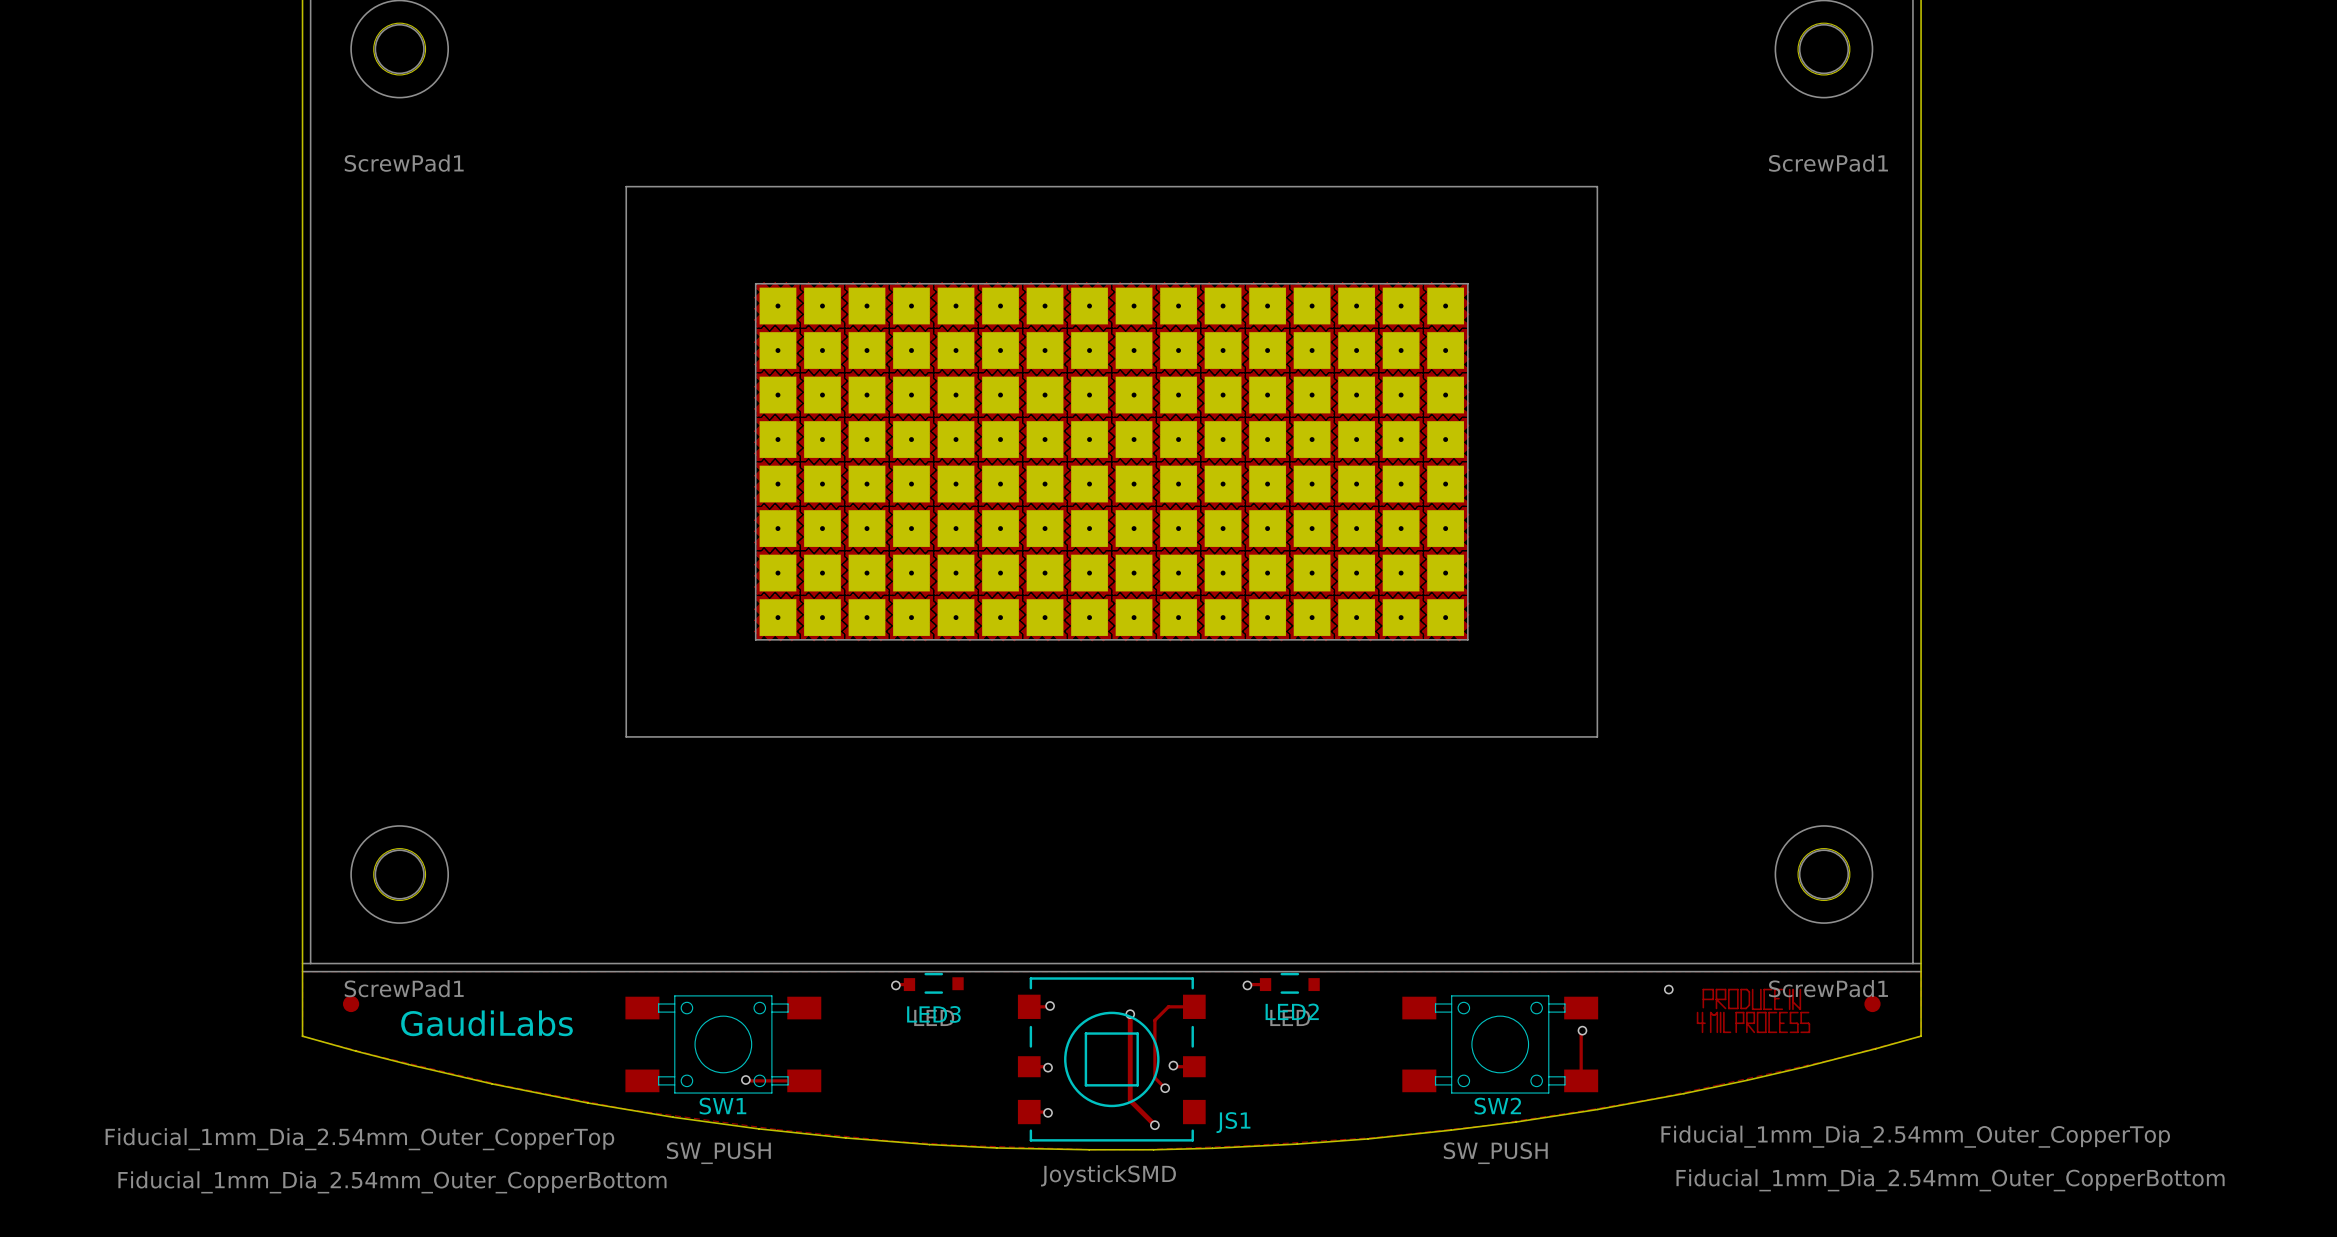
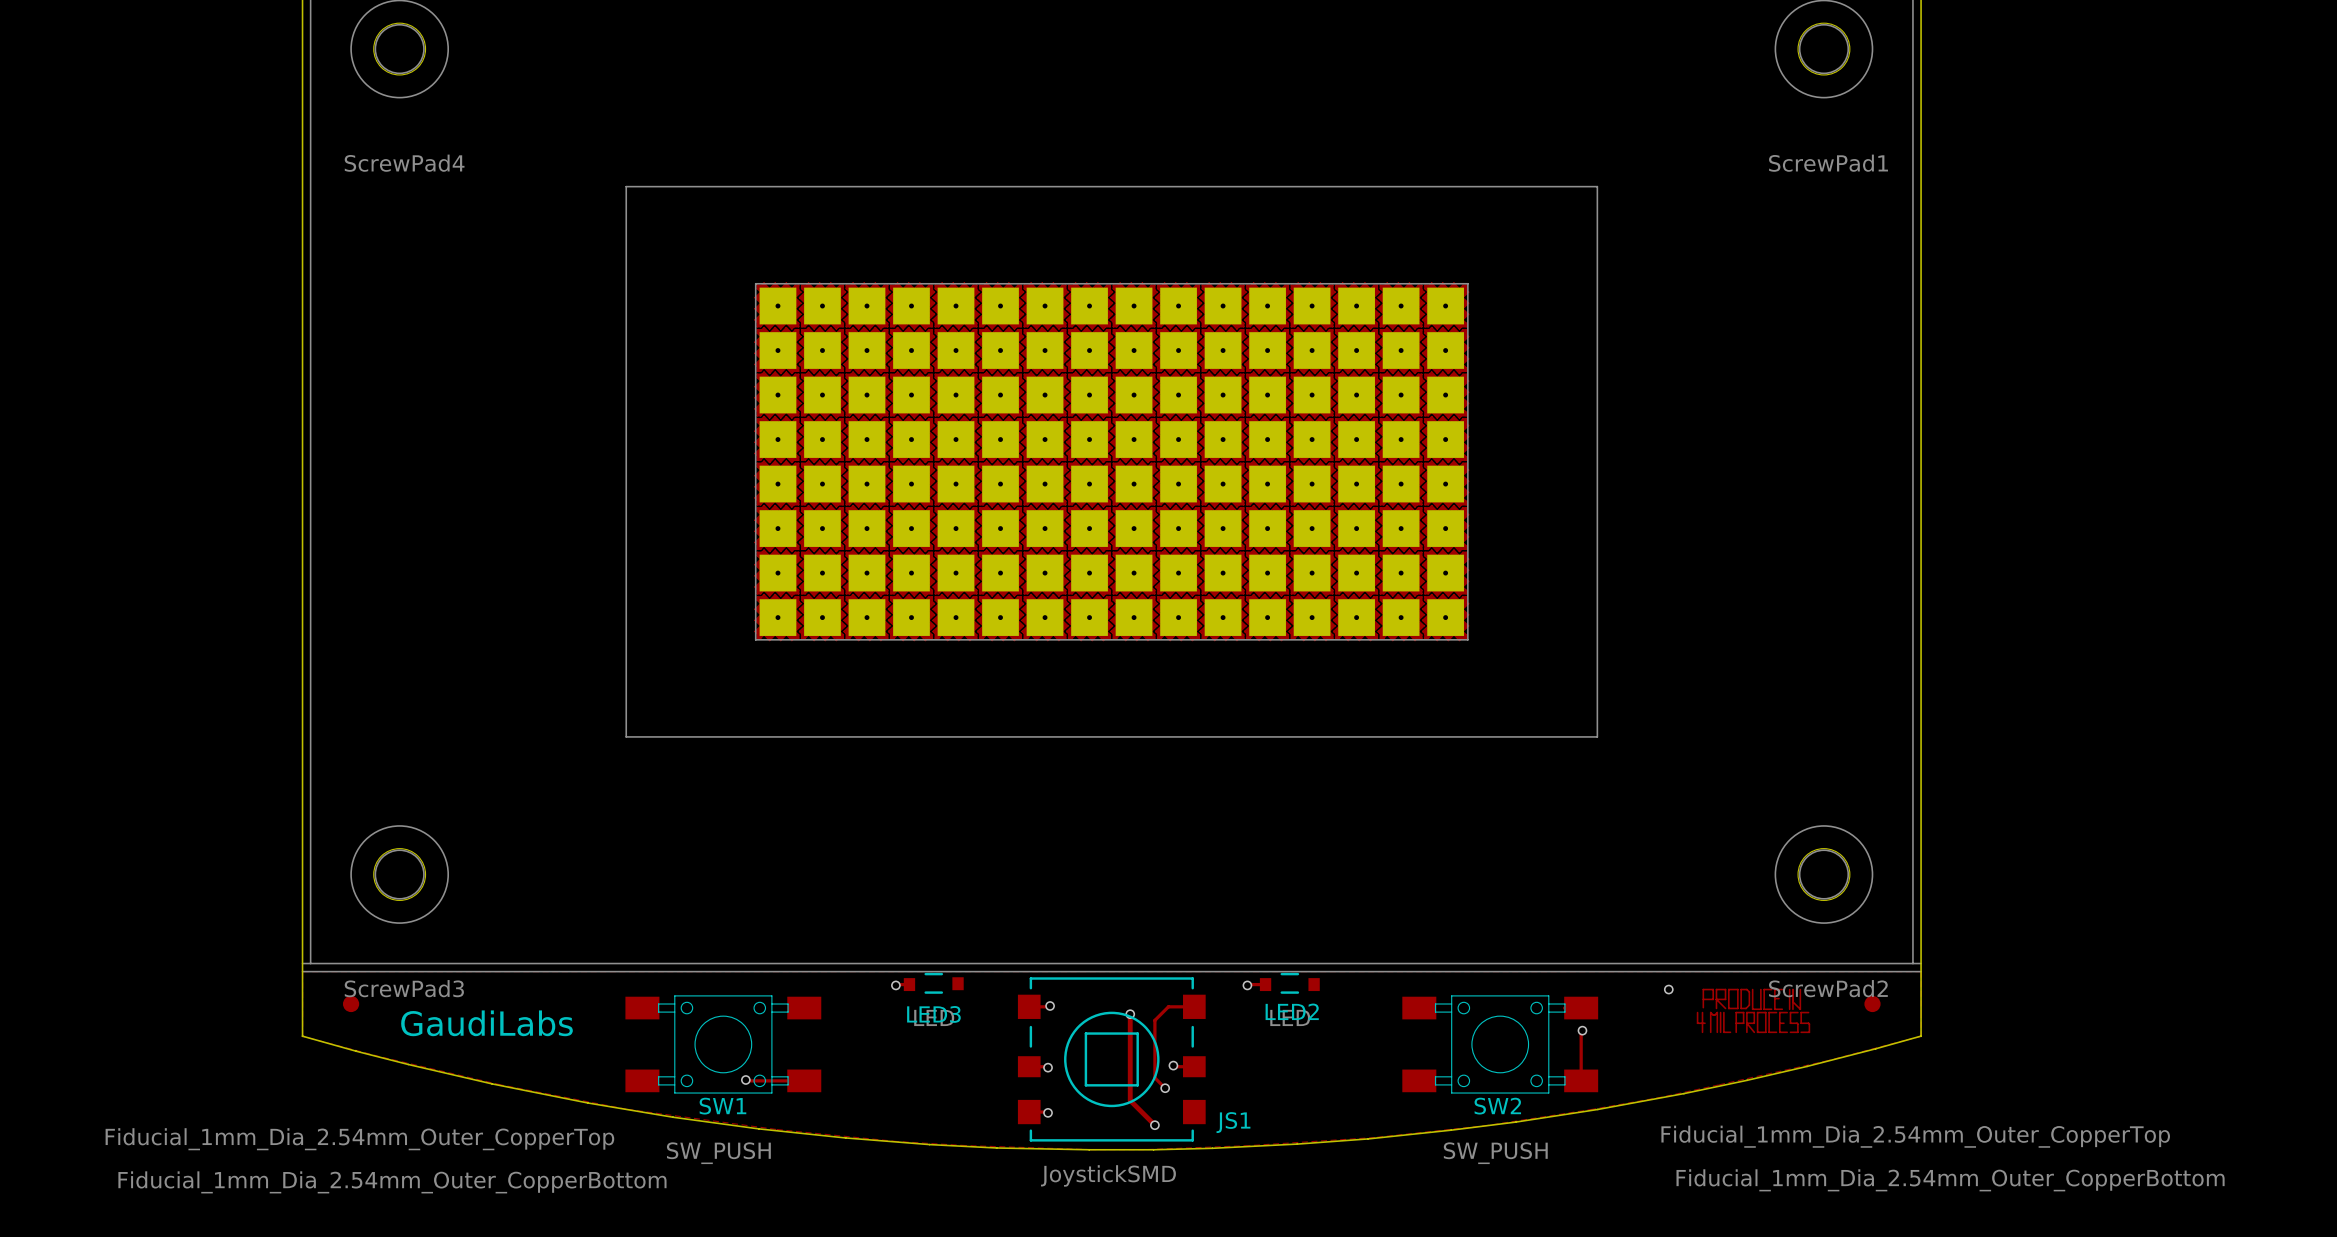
part value: ScrewPad1 (404, 163) -> ScrewPad4 (404, 163)
part value: ScrewPad1 (404, 988) -> ScrewPad3 (404, 988)
part value: ScrewPad1 (1828, 988) -> ScrewPad2 (1828, 988)

